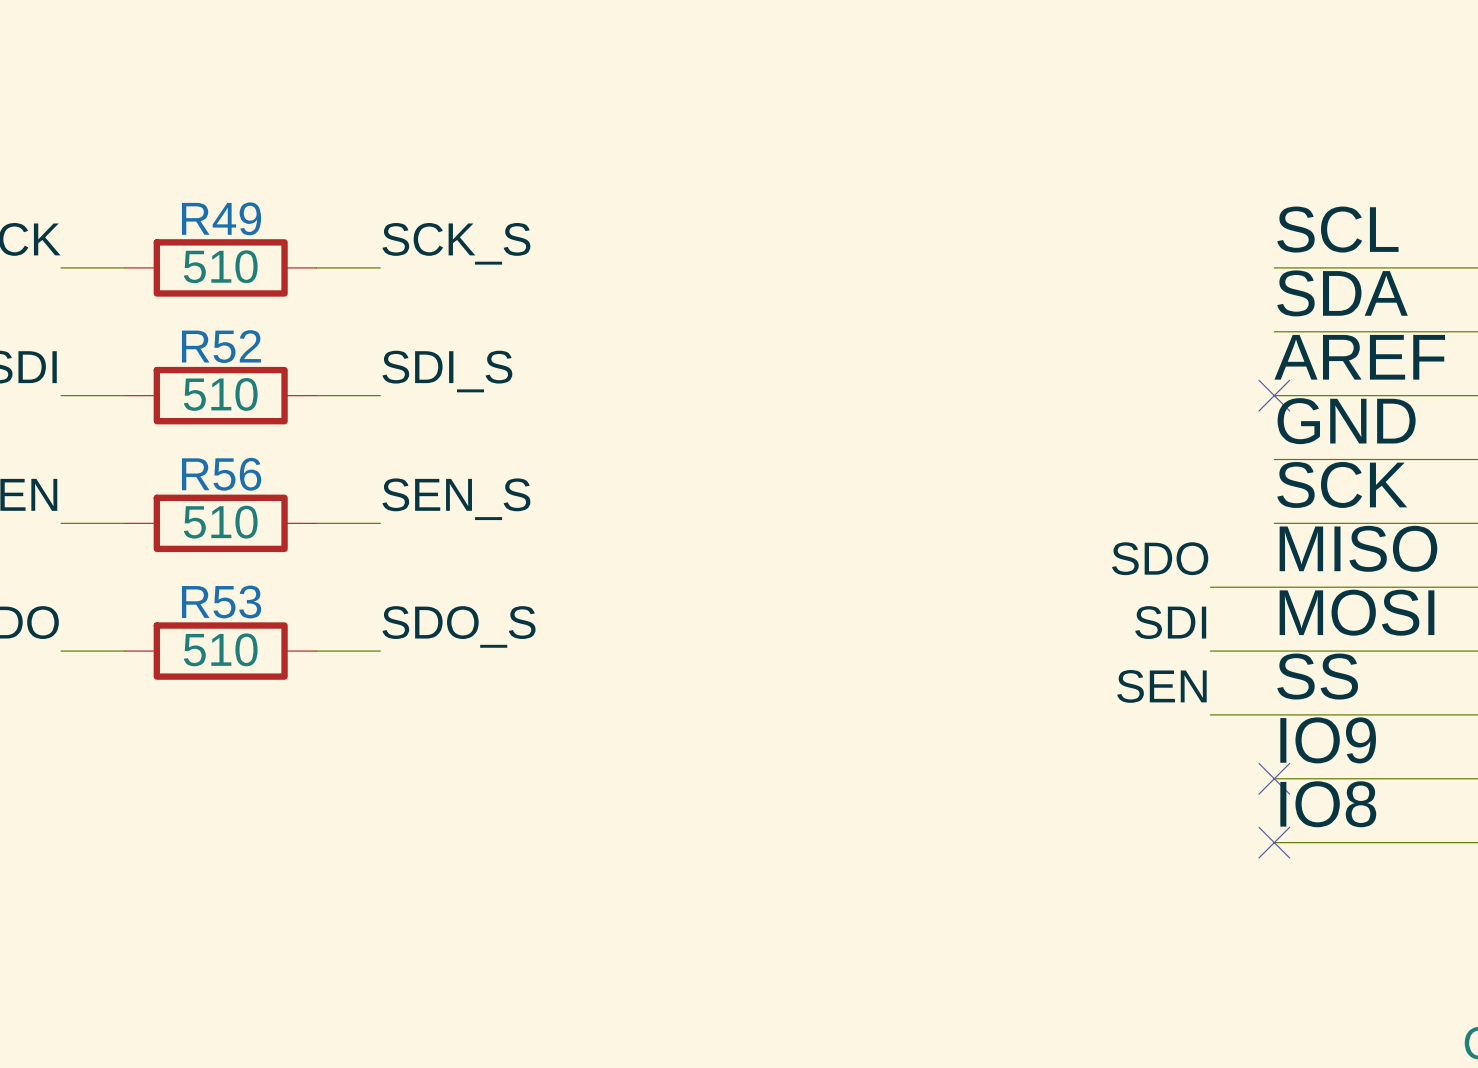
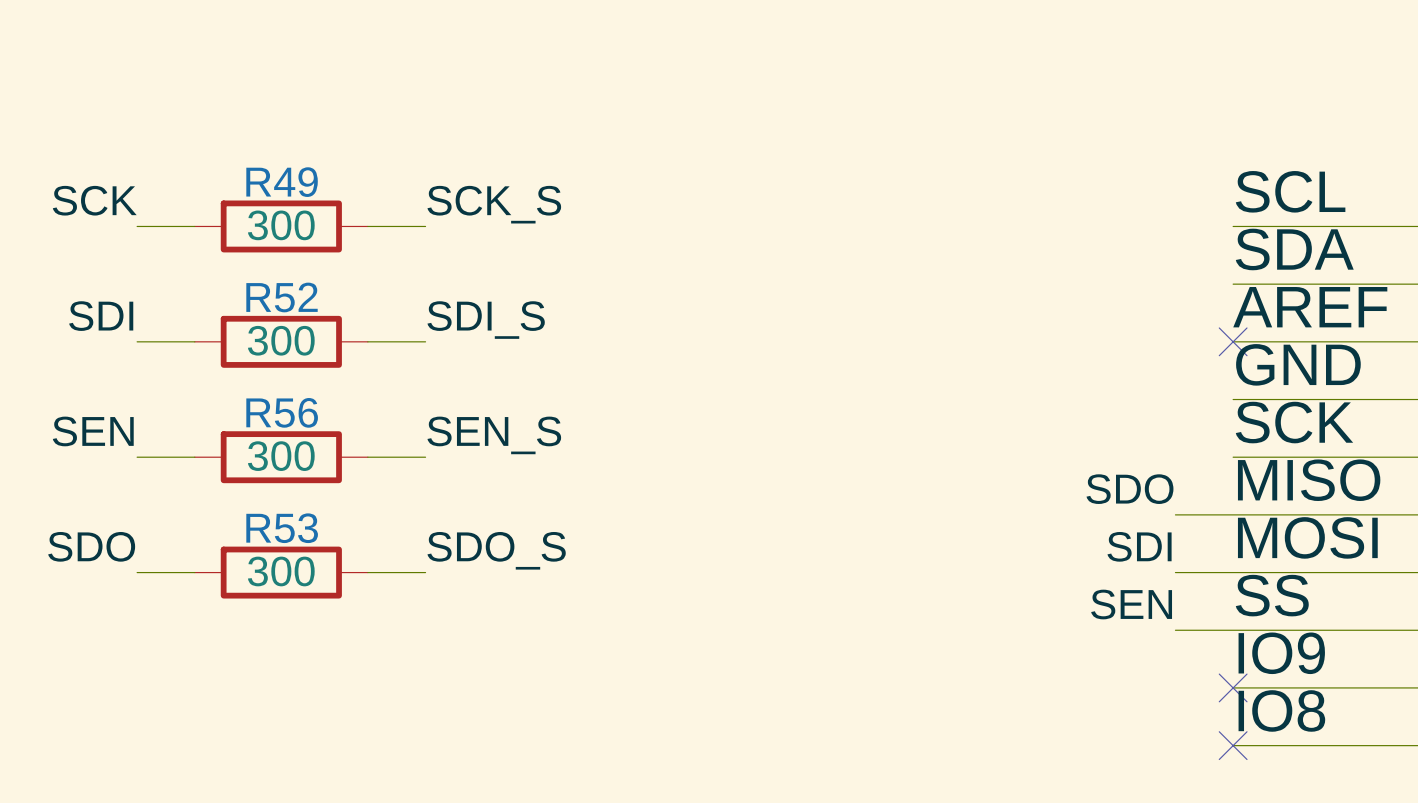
R49 value: 510 (220, 266) -> 300 (281, 225)
R52 value: 510 (220, 394) -> 300 (281, 340)
R56 value: 510 (220, 522) -> 300 (281, 456)
R53 value: 510 (220, 649) -> 300 (281, 571)

